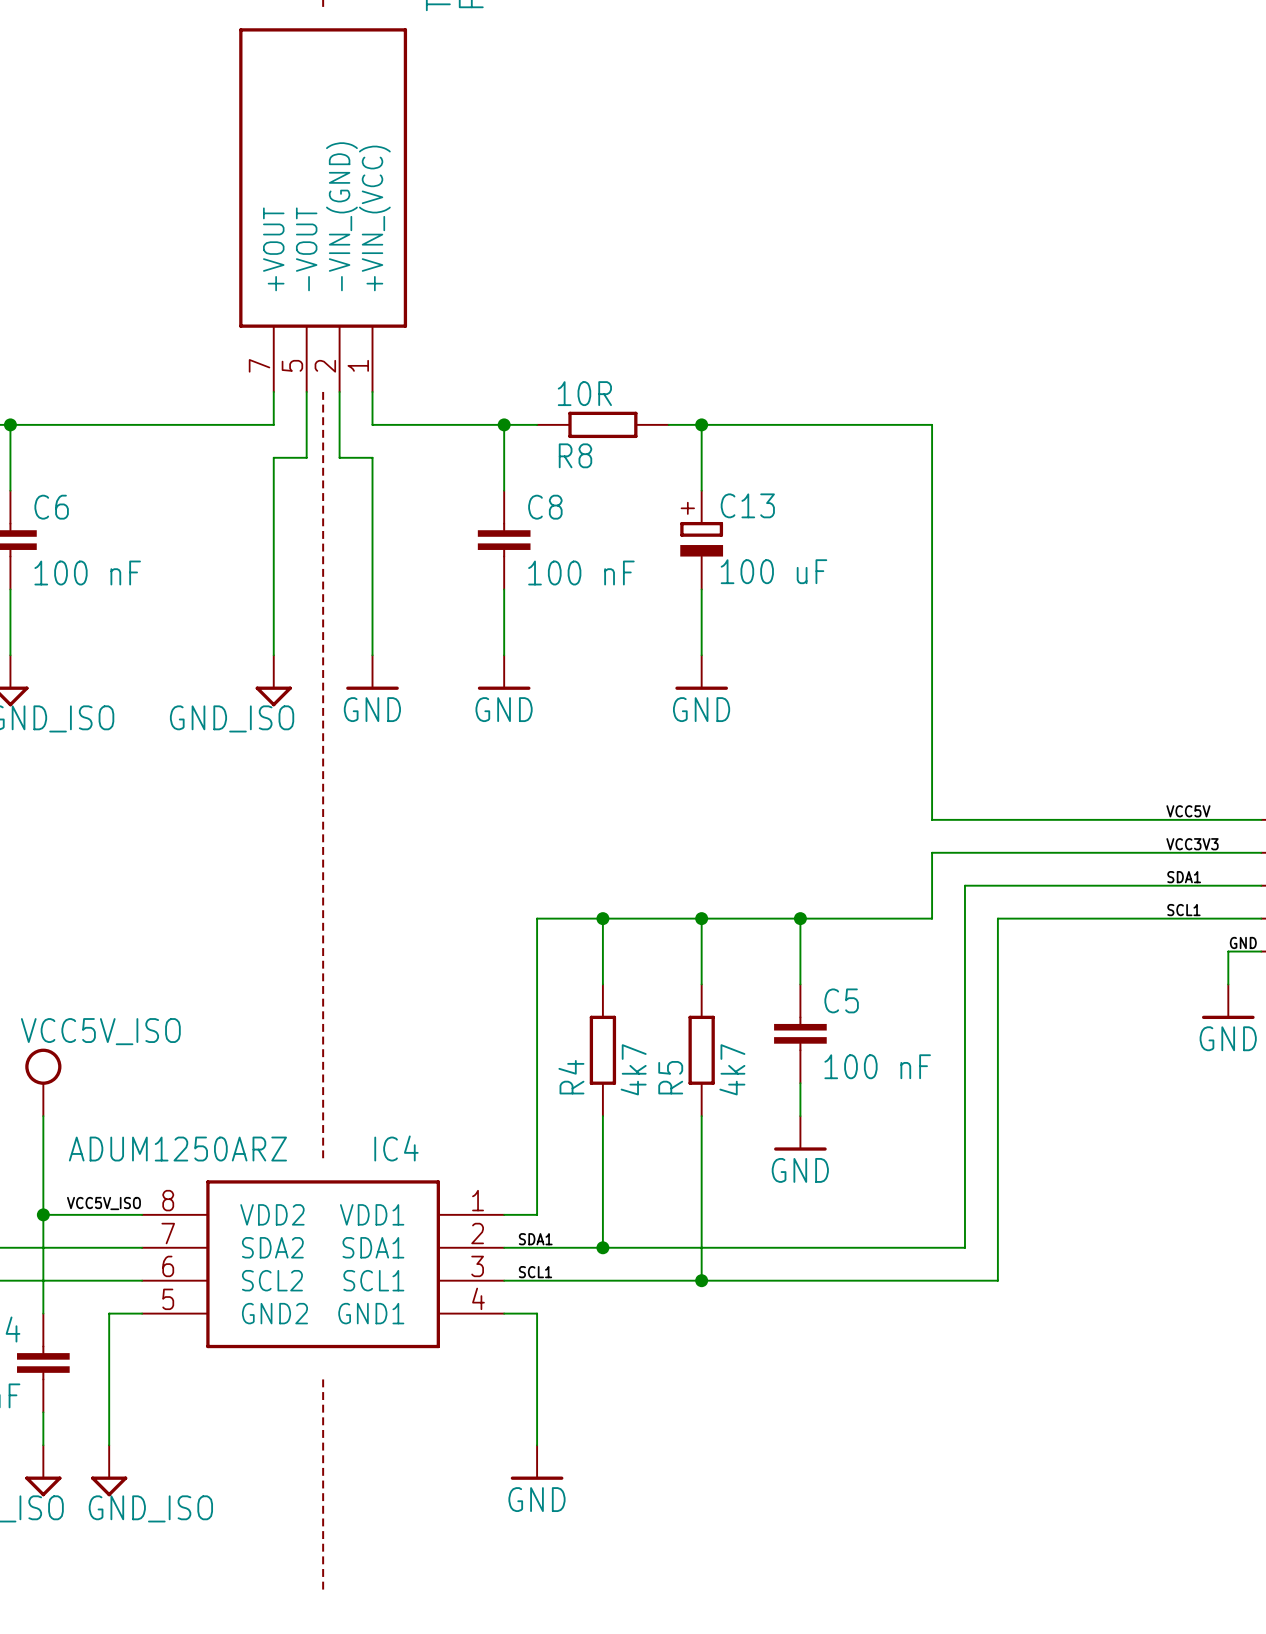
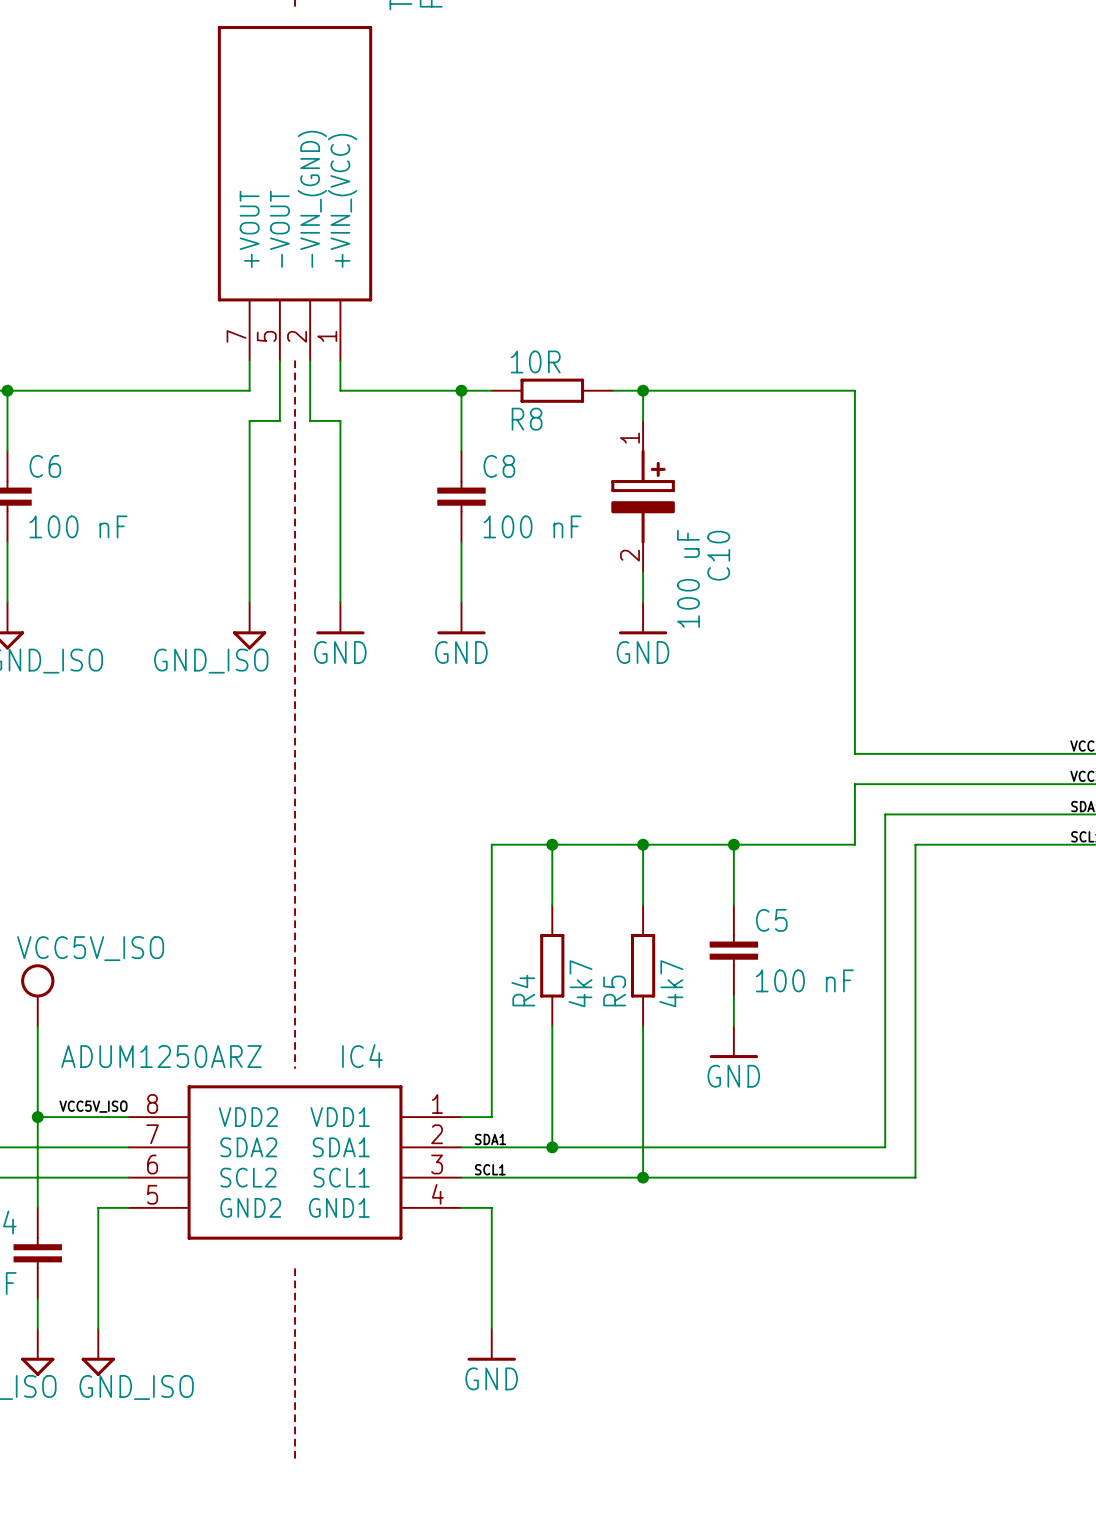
C13: 100 uF (701, 540) -> none
C10: none -> 100 uF (643, 496)

